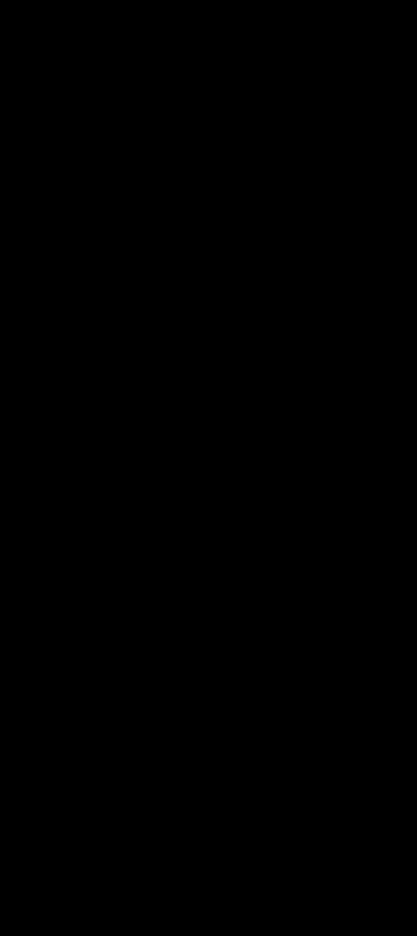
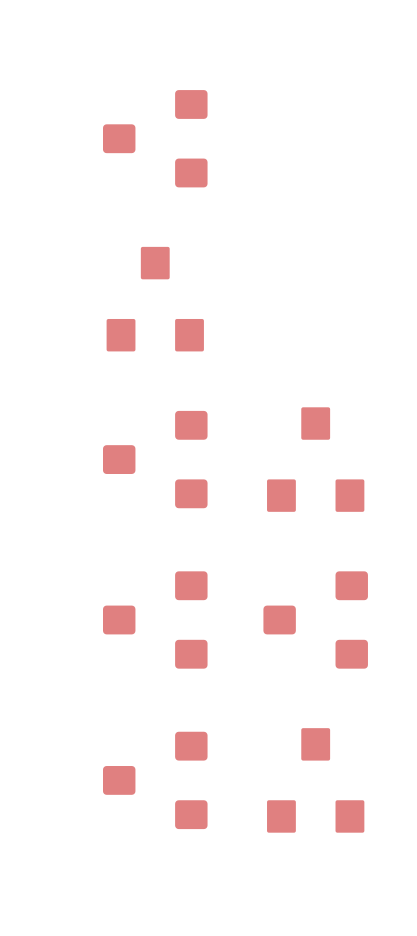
part: none -> (155, 138)
part: none -> (155, 299)
part: none -> (155, 459)
part: none -> (315, 459)
part: none -> (155, 619)
part: none -> (315, 619)
part: none -> (155, 780)
part: none -> (315, 780)

